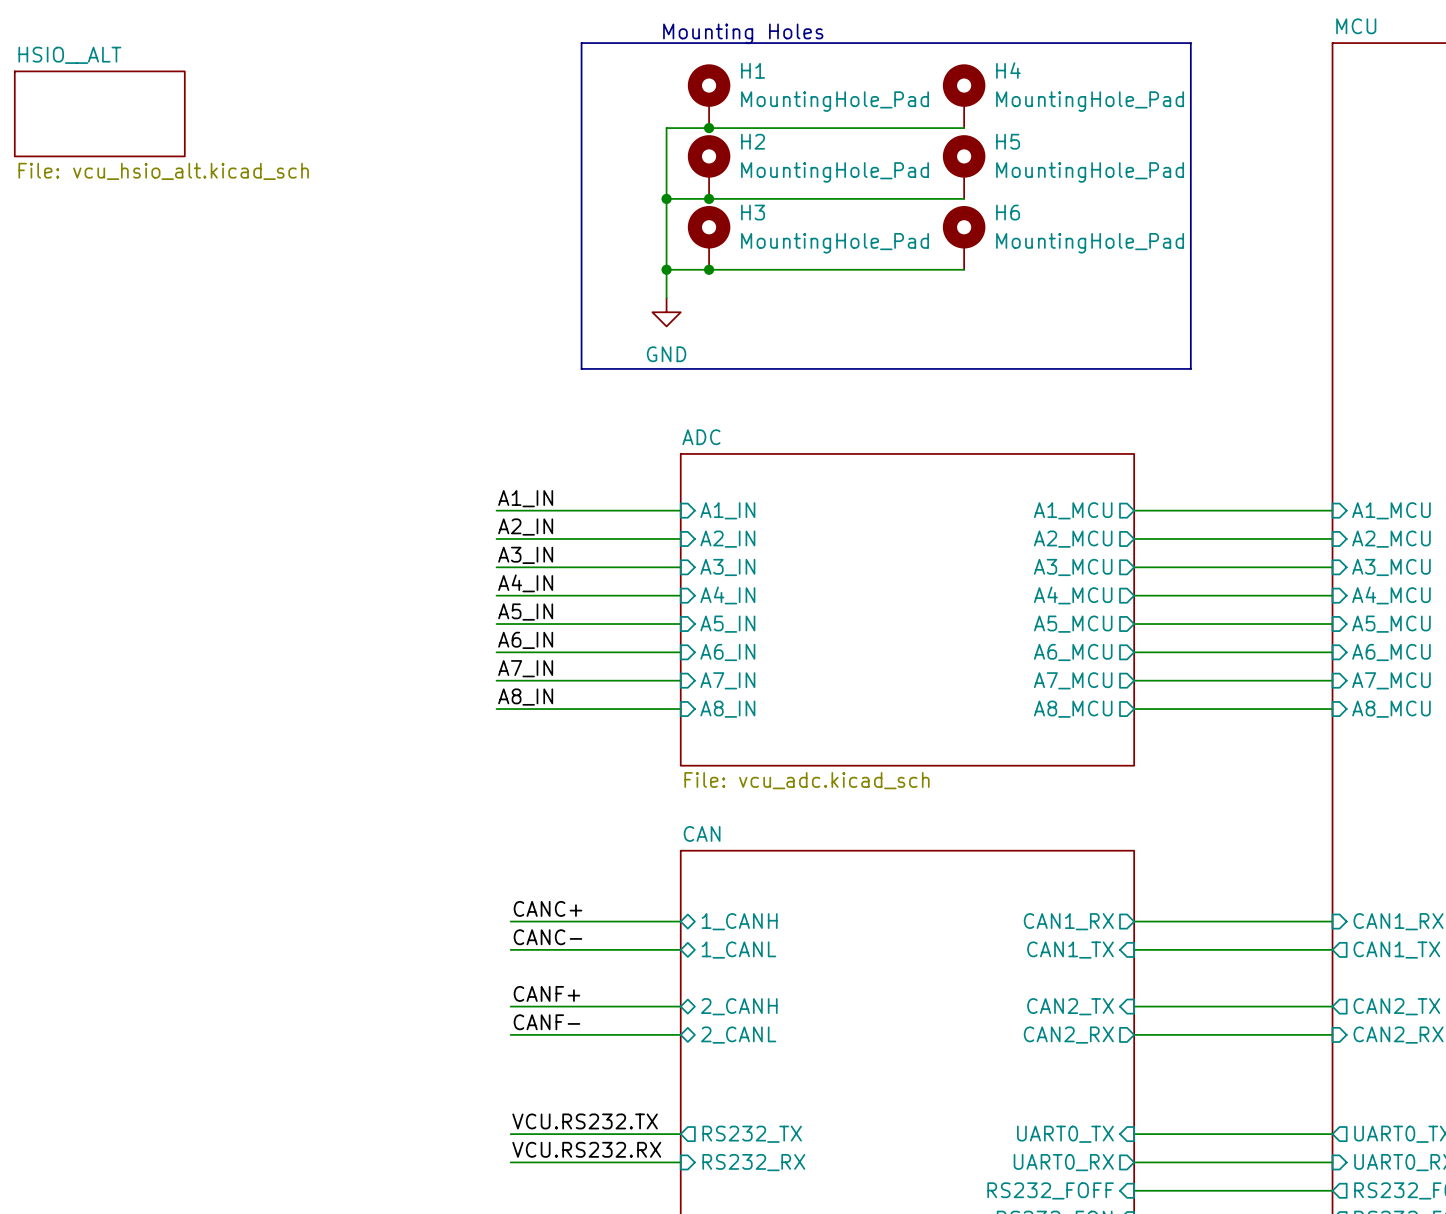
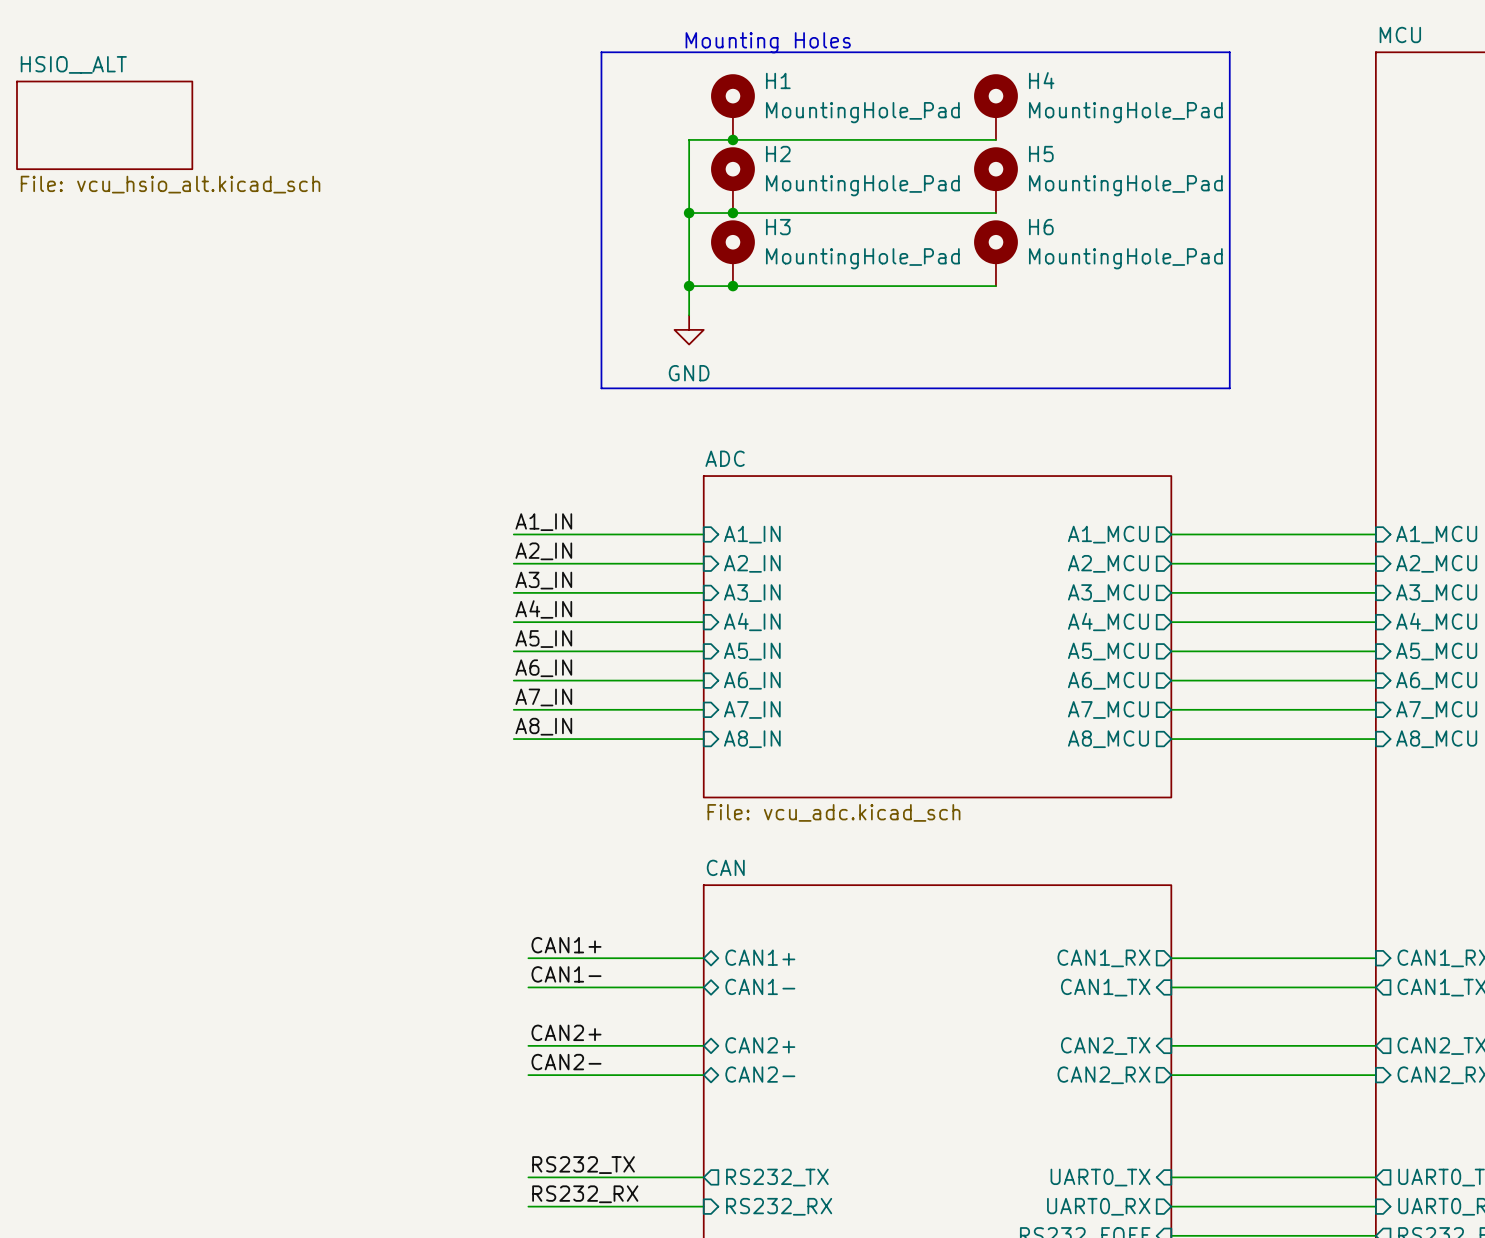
label: CANC+ (547, 908) -> CAN1+ (566, 945)
sheet pin: 1_CANH (739, 921) -> CAN1+ (760, 957)
label: CANC- (547, 937) -> CAN1- (566, 974)
sheet pin: 1_CANL (738, 950) -> CAN1- (760, 986)
label: CANF+ (546, 993) -> CAN2+ (566, 1032)
sheet pin: 2_CANH (739, 1006) -> CAN2+ (760, 1045)
label: CANF- (546, 1022) -> CAN2- (566, 1062)
sheet pin: 2_CANL (738, 1035) -> CAN2- (760, 1074)
label: VCU.RS232.TX (585, 1121) -> RS232_TX (583, 1165)
label: VCU.RS232.RX (586, 1149) -> RS232_RX (585, 1194)

